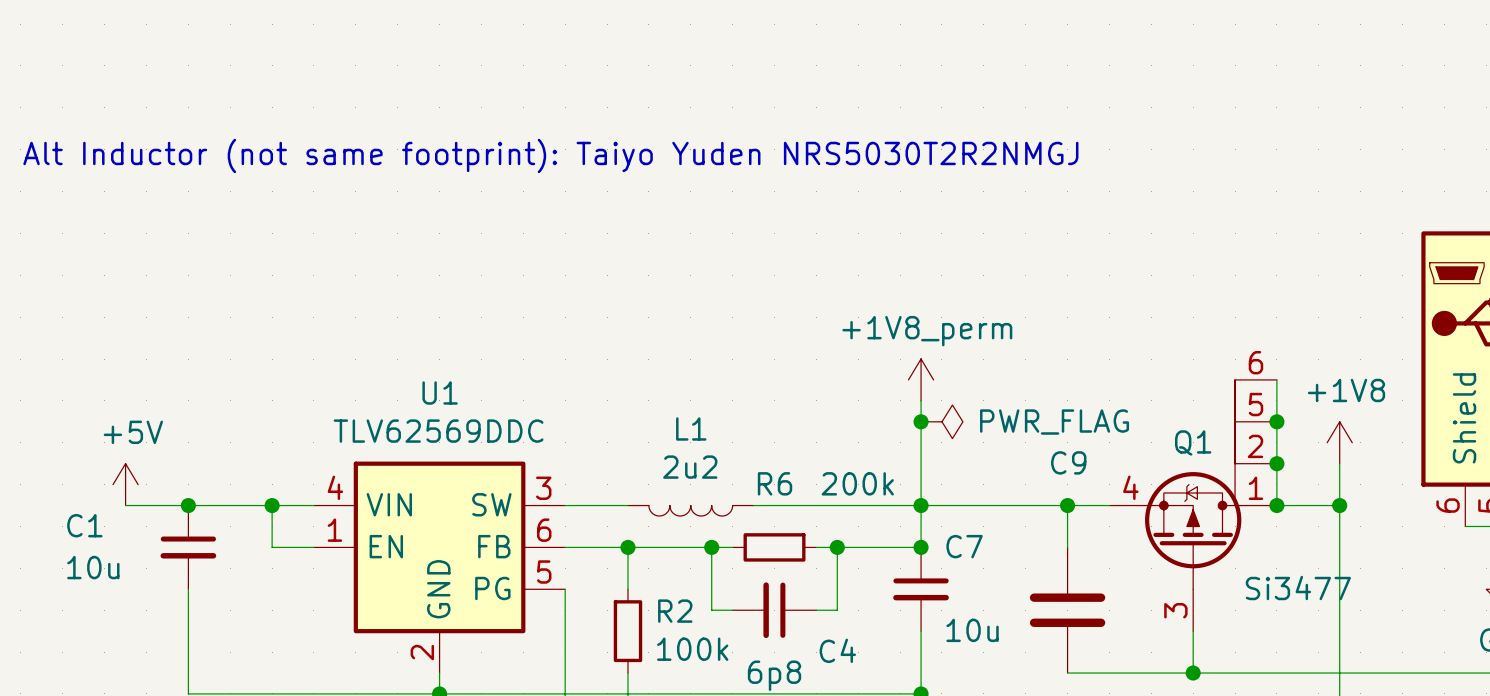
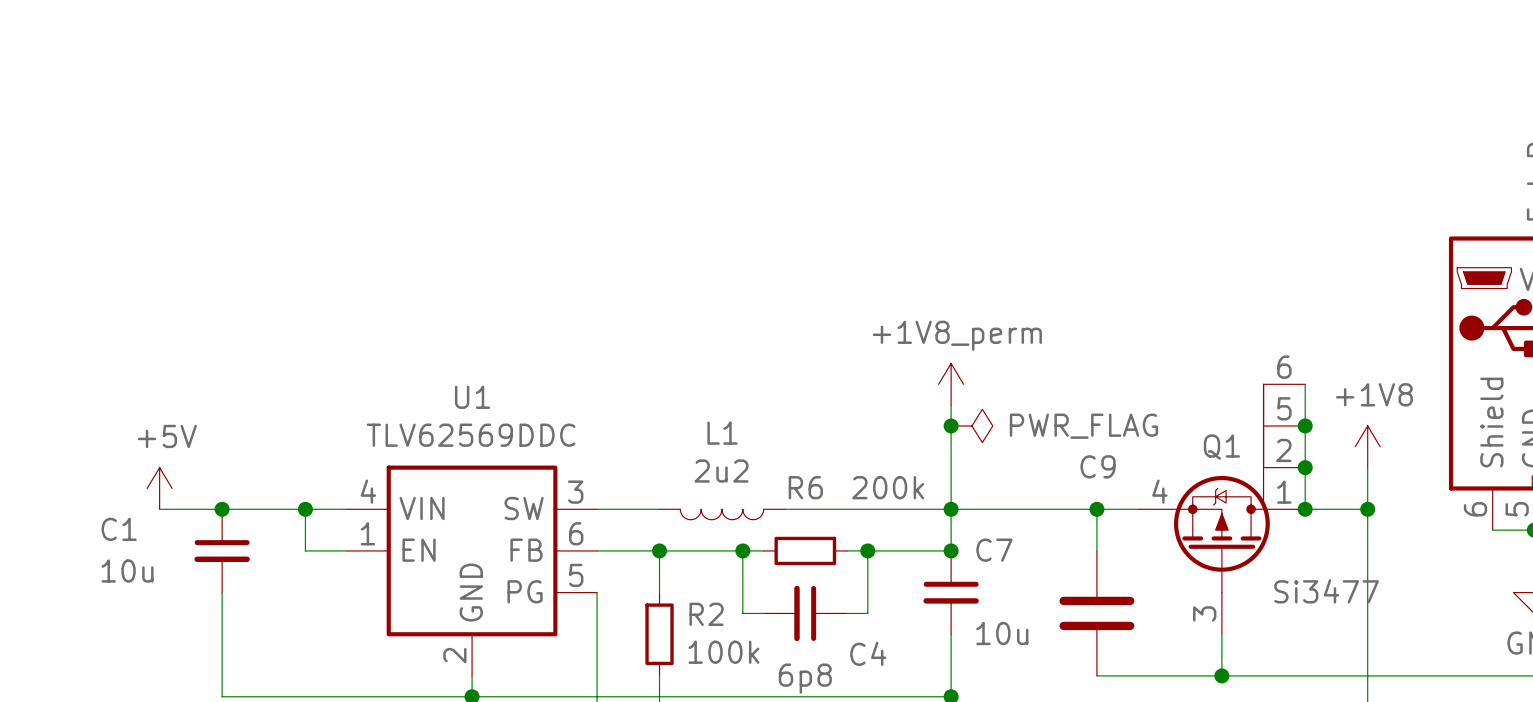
text: Alt Inductor (not same footprint): Taiyo Yuden NRS5030T2R2NMGJ (550, 155) -> none

